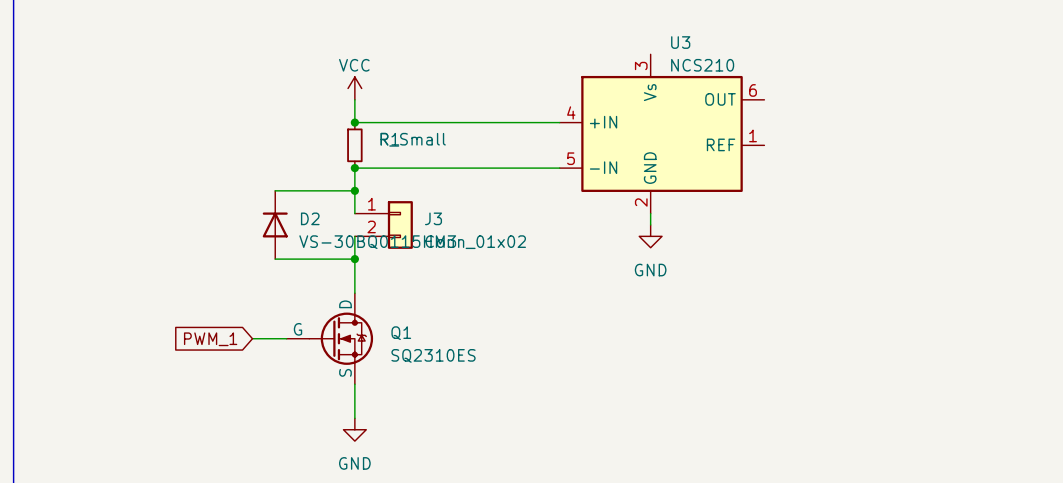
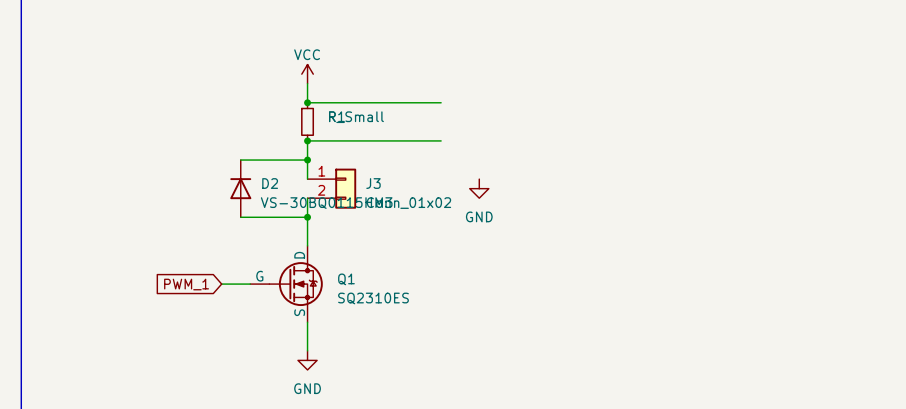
wire: (514, 122) (559, 122) -> none
U3: NCS210 (662, 133) -> none
wire: (514, 168) (559, 168) -> none
wire: (650, 213) (650, 224) -> none
power symbol position: GND (650, 236) -> GND (479, 188)

